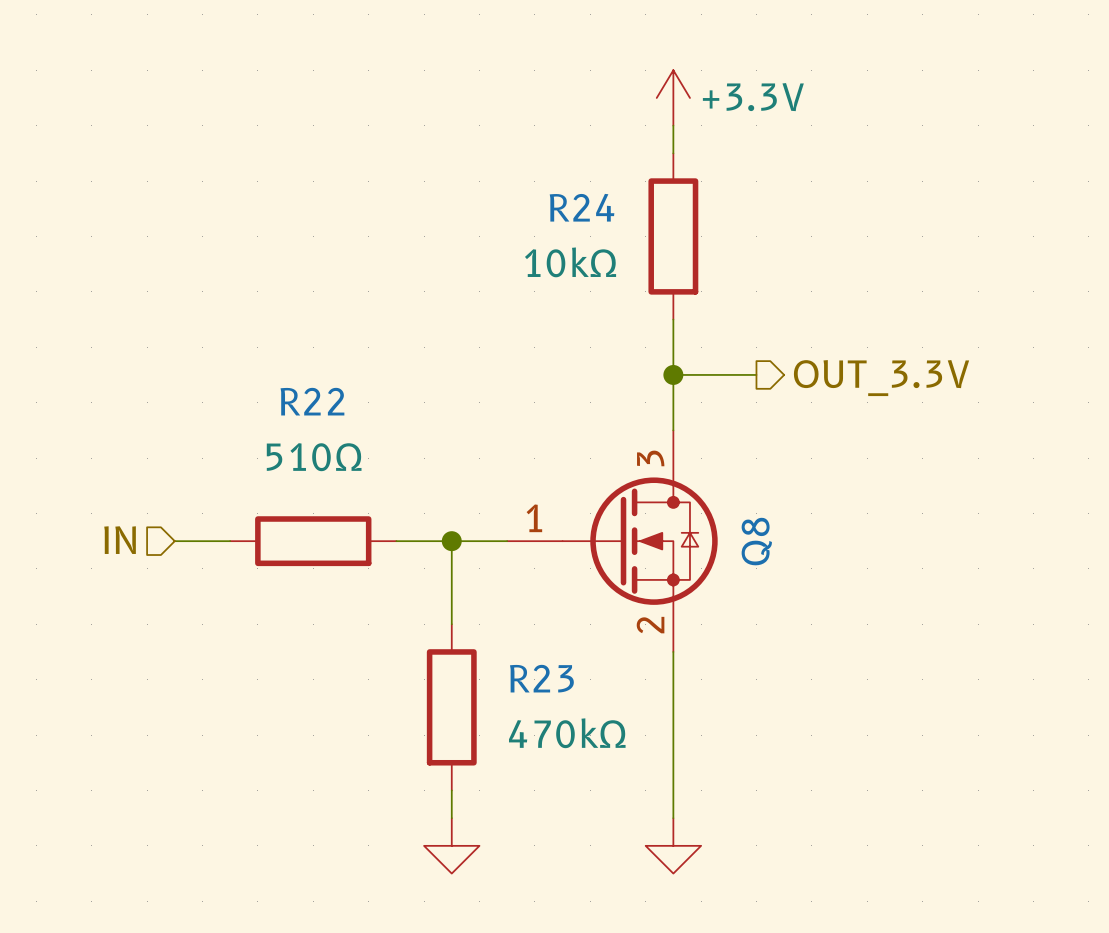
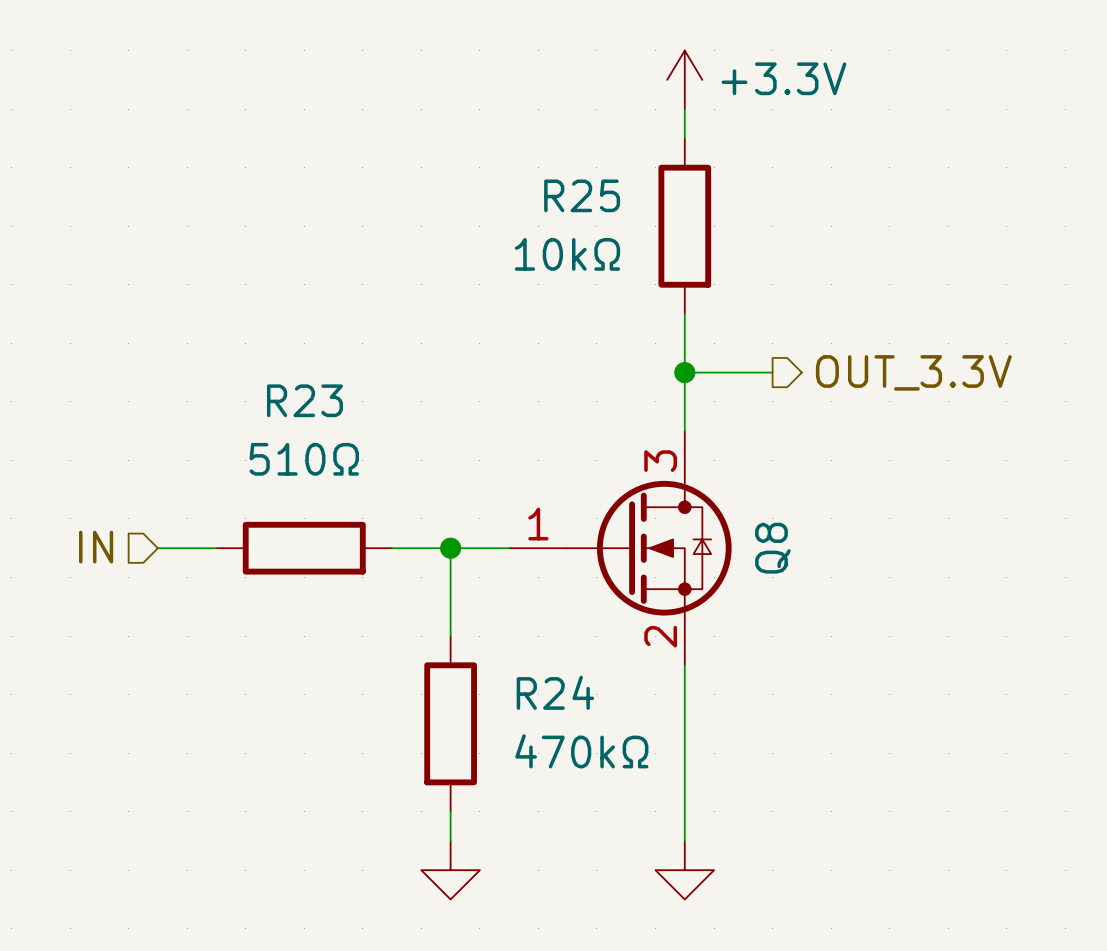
R24 name: R24 (582, 207) -> R25 (582, 195)
R22 name: R22 (312, 401) -> R23 (304, 400)
R23 name: R23 (541, 678) -> R24 (555, 692)

